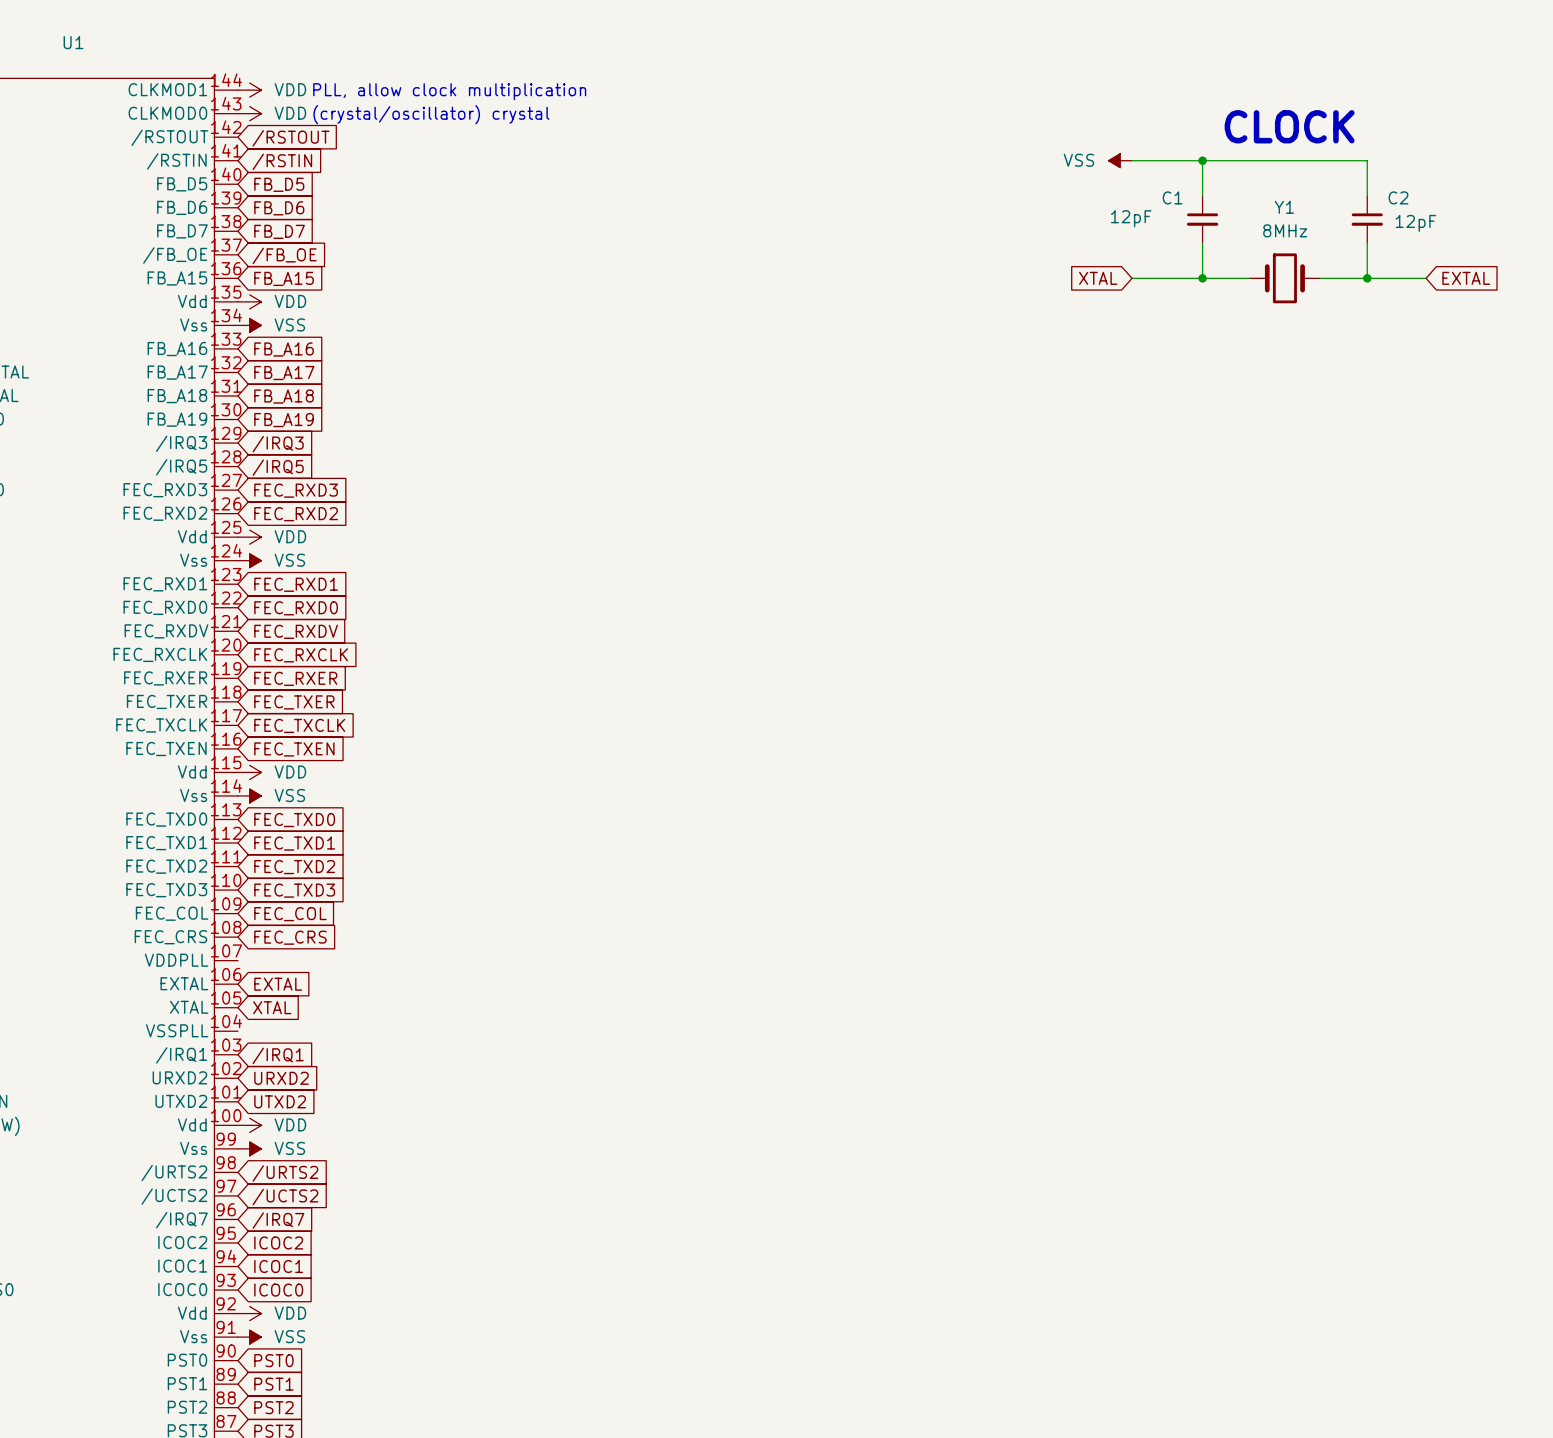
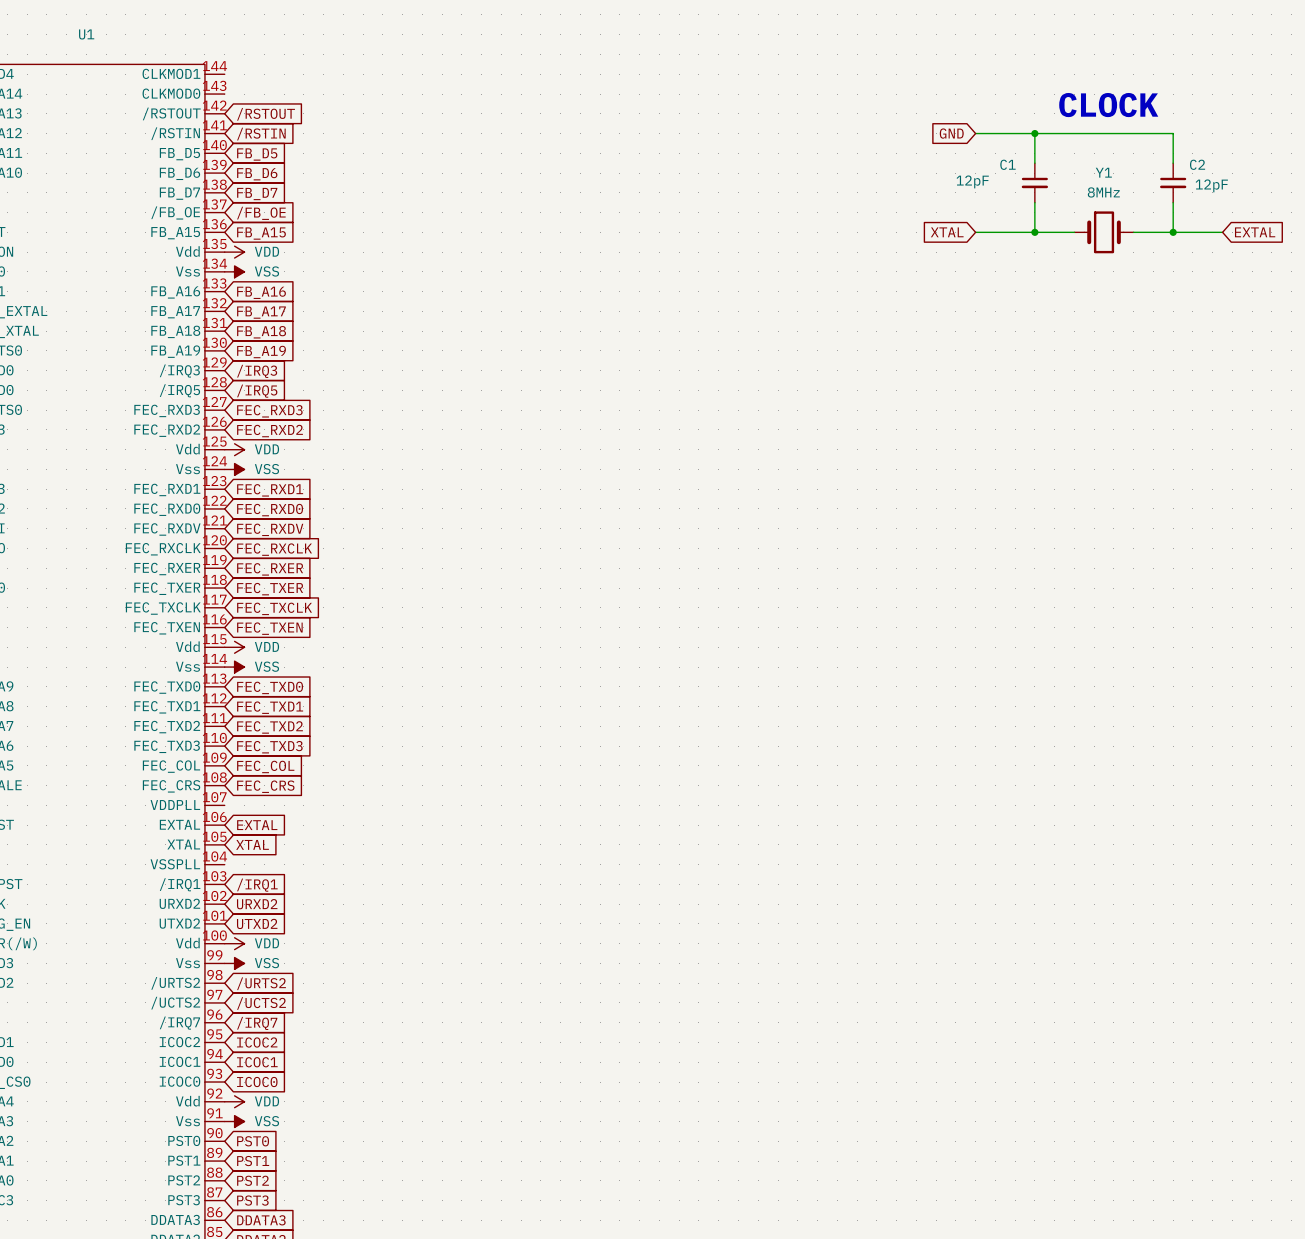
power symbol: VDD (249, 90) -> none
text: PLL, allow clock multiplication (449, 91) -> none
power symbol: VDD (249, 113) -> none
text: (crystal/oscillator) crystal (431, 114) -> none
global label: none -> GND (951, 133)
power symbol: VSS (1120, 160) -> none

